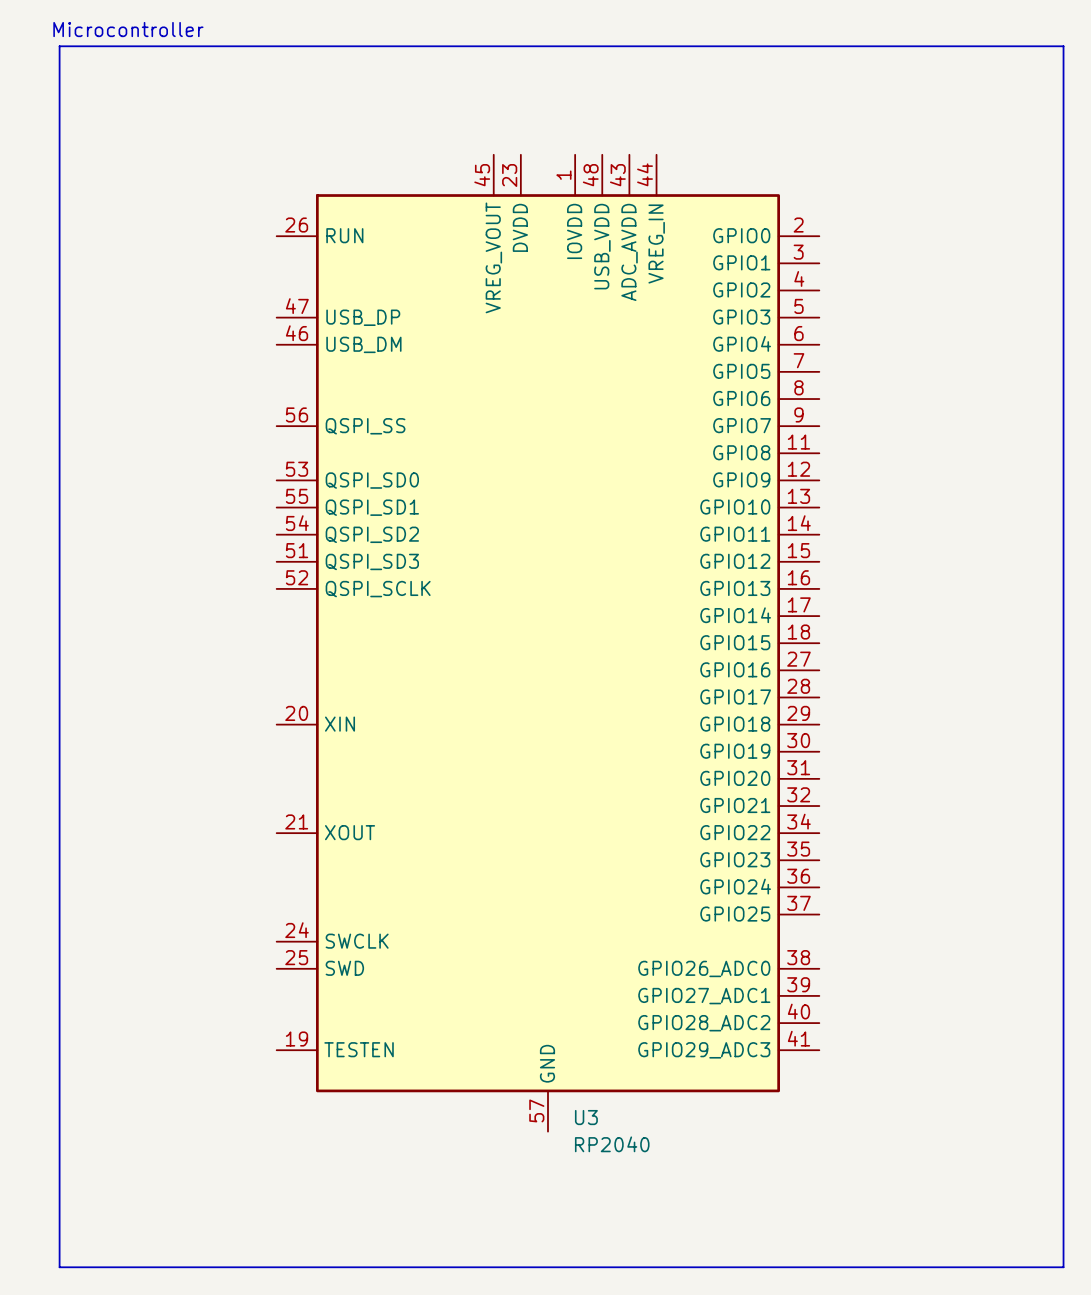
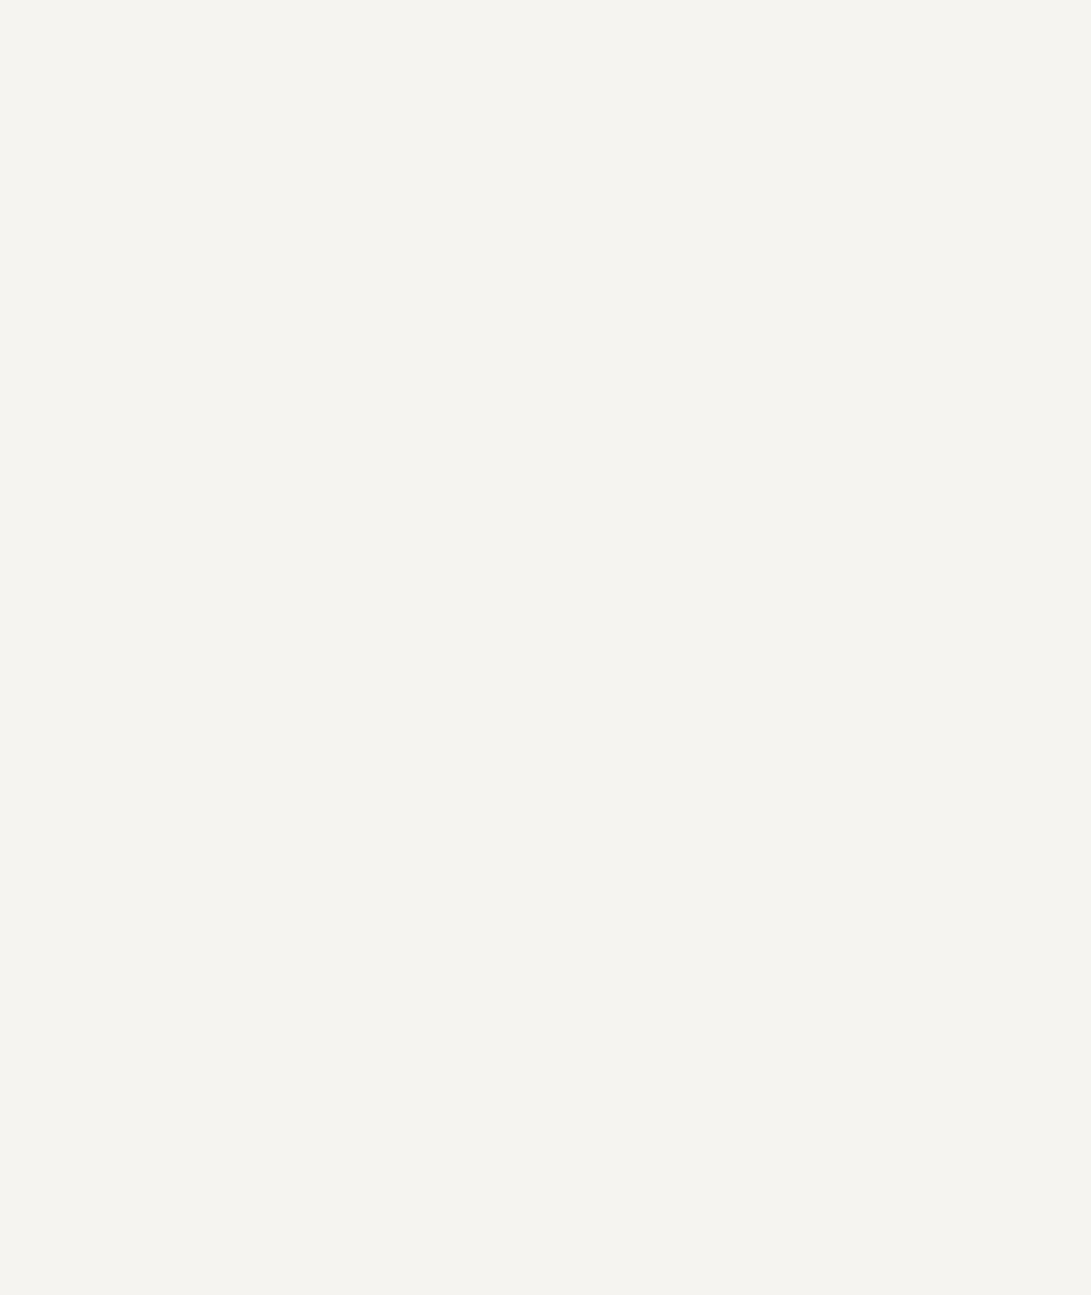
text: Microcontroller (128, 29) -> none
line: (59, 46) (1063, 46) (1063, 1267) (59, 1267) (59, 46) -> none
U3: RP2040 (548, 643) -> none

